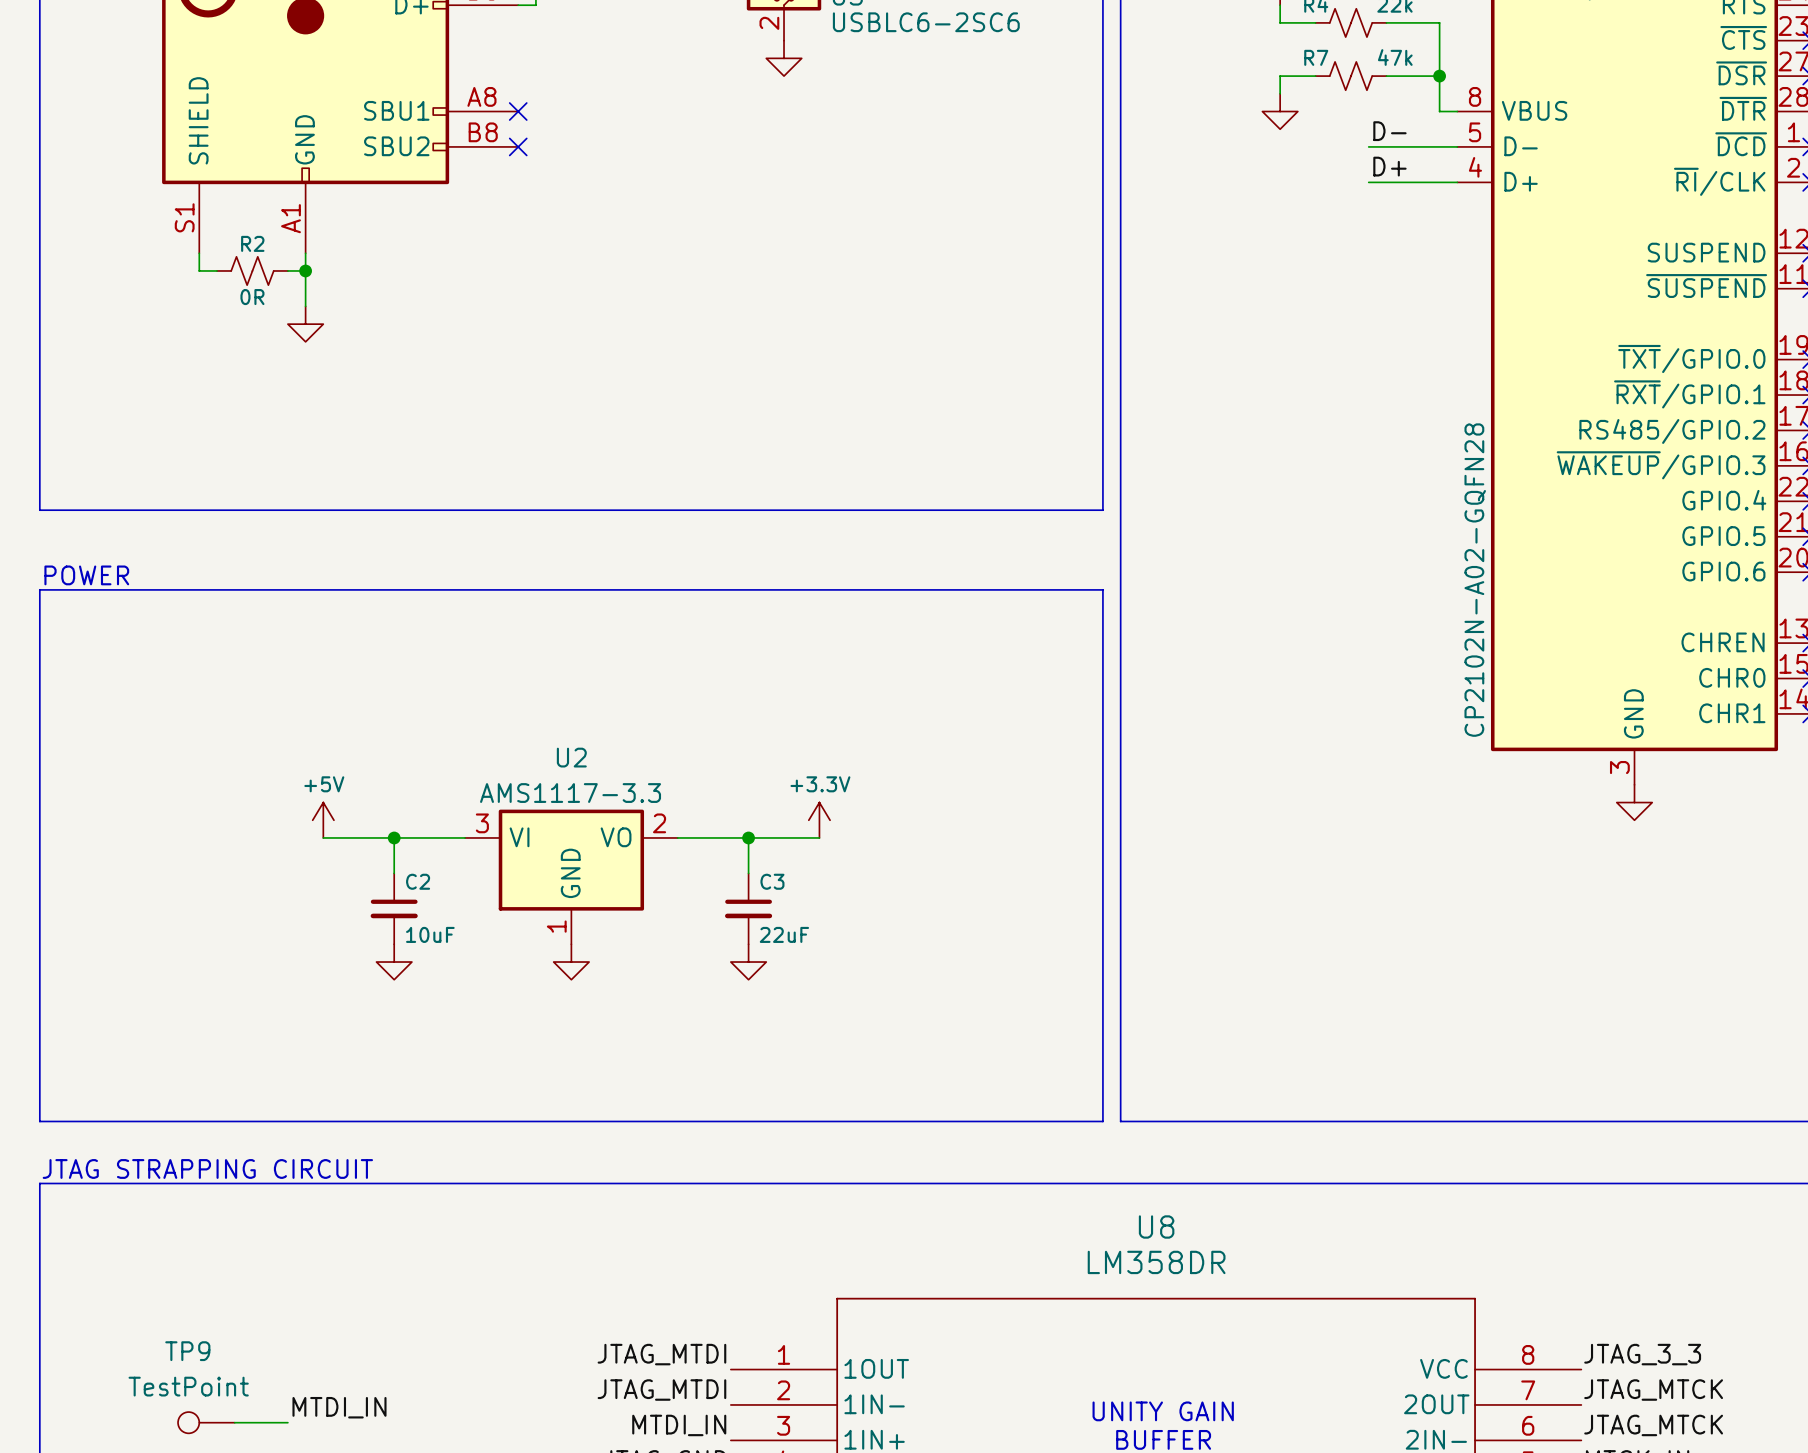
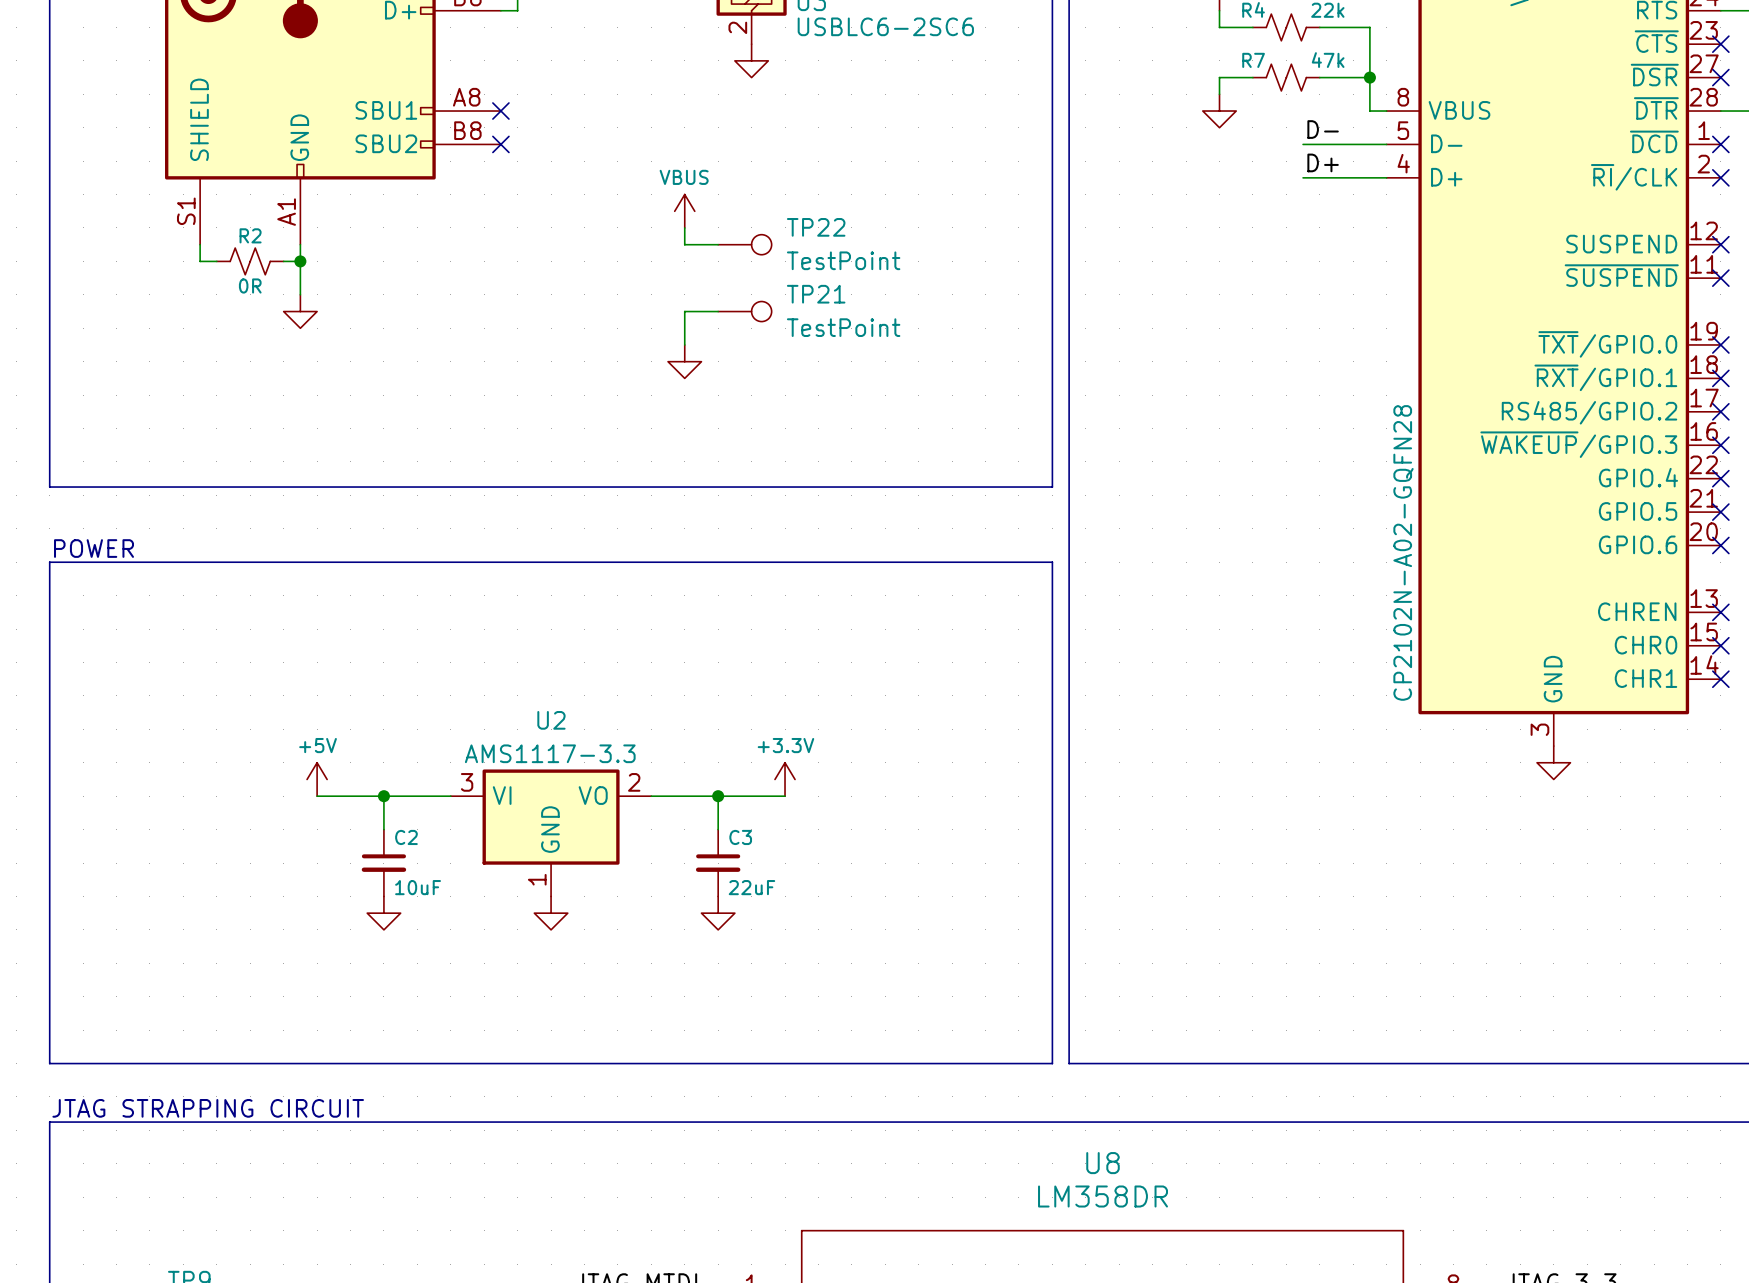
power symbol: none -> VBUS (684, 211)
wire: none -> (684, 227) (684, 244) (718, 244)
TP22: none -> TestPoint (744, 244)
wire: none -> (718, 311) (684, 311) (684, 344)
TP21: none -> TestPoint (744, 311)
power symbol: none -> (684, 361)

